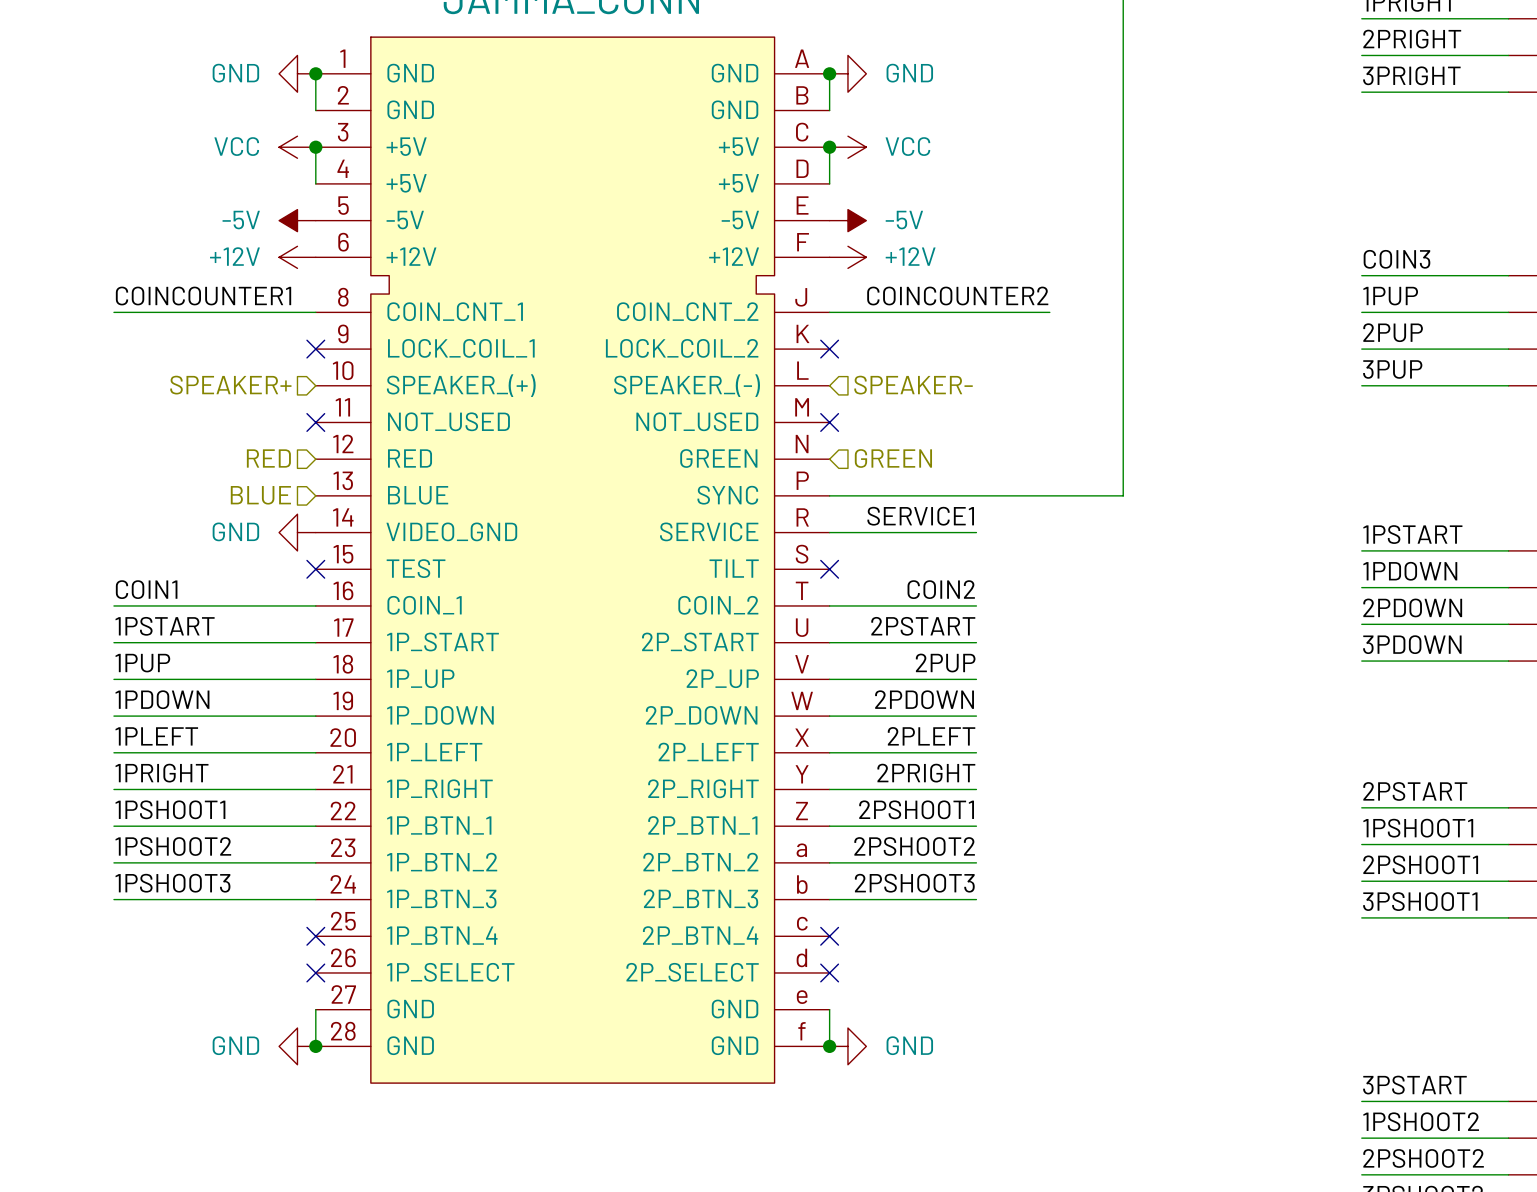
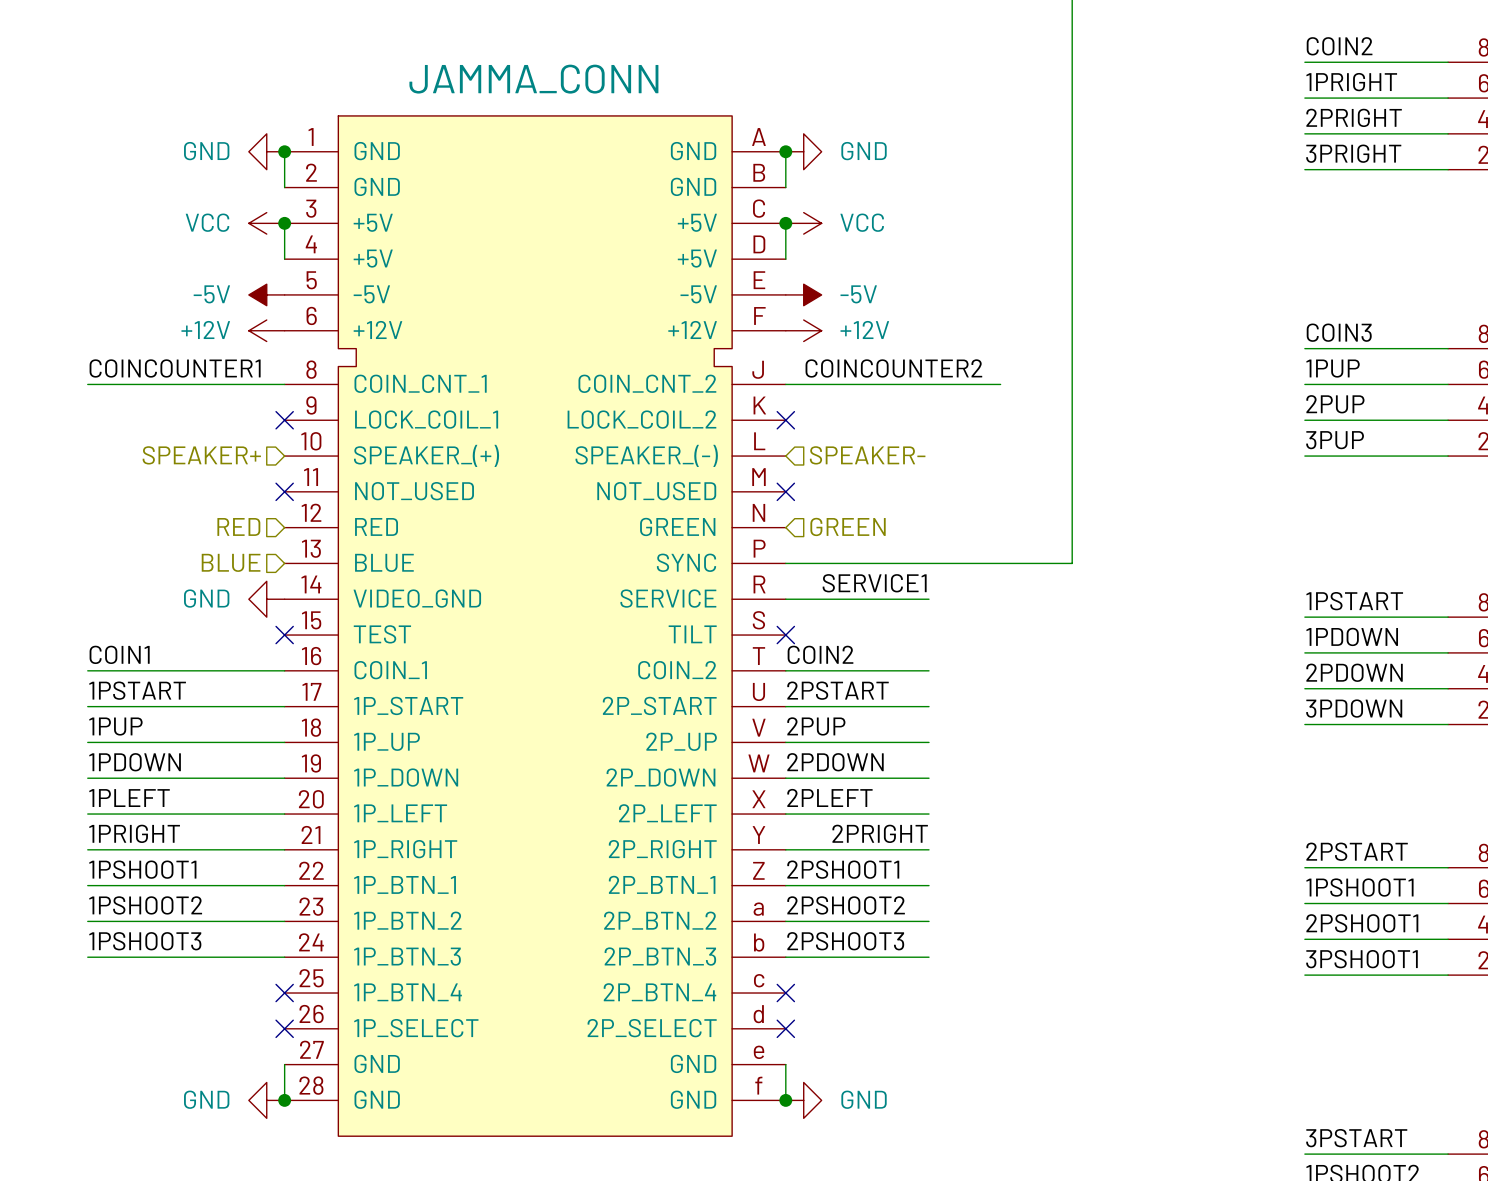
label position: COINCOUNTER2 (957, 296) -> COINCOUNTER2 (893, 368)
label position: COIN2 (941, 589) -> COIN2 (820, 654)
label position: 2PSTART (923, 626) -> 2PSTART (838, 690)
label position: 2PUP (945, 663) -> 2PUP (816, 726)
label position: 2PDOWN (924, 699) -> 2PDOWN (835, 762)
label position: 2PLEFT (931, 736) -> 2PLEFT (829, 797)
label position: 2PSHOOT1 (916, 809) -> 2PSHOOT1 (843, 869)
label position: 2PSHOOT2 (914, 846) -> 2PSHOOT2 (846, 905)
label position: 2PSHOOT3 (914, 883) -> 2PSHOOT3 (845, 941)

